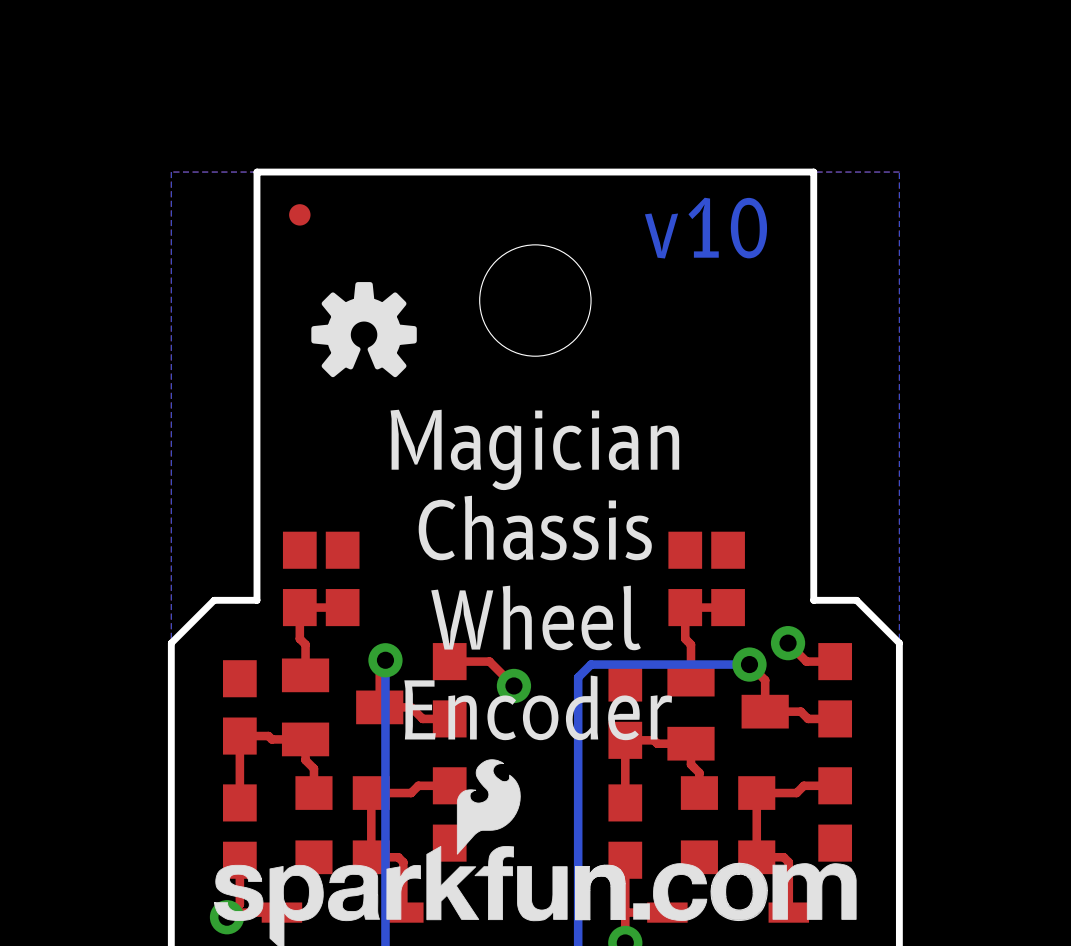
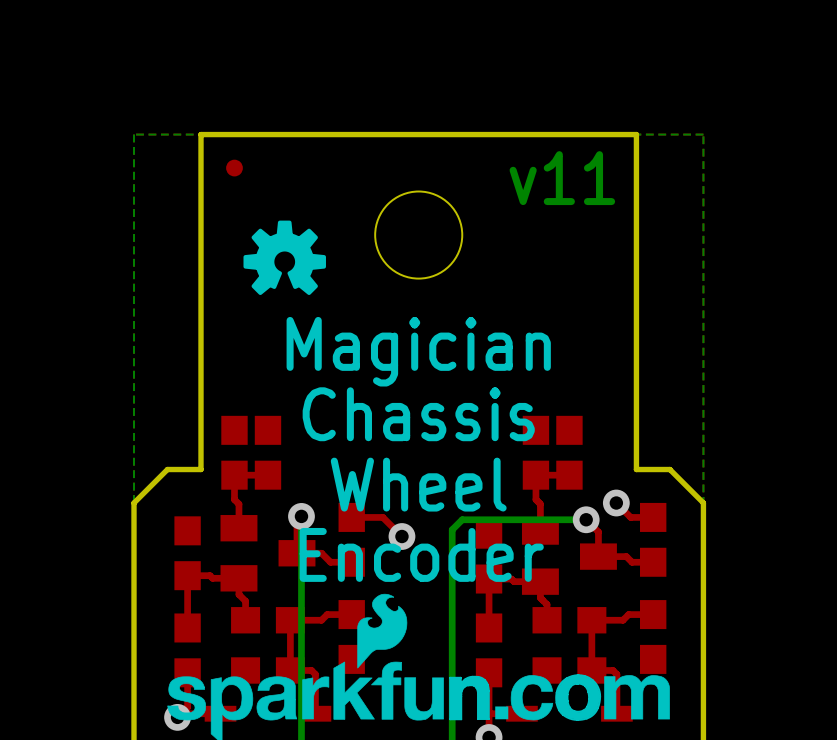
text: v10 (705, 228) -> v11 (562, 178)

